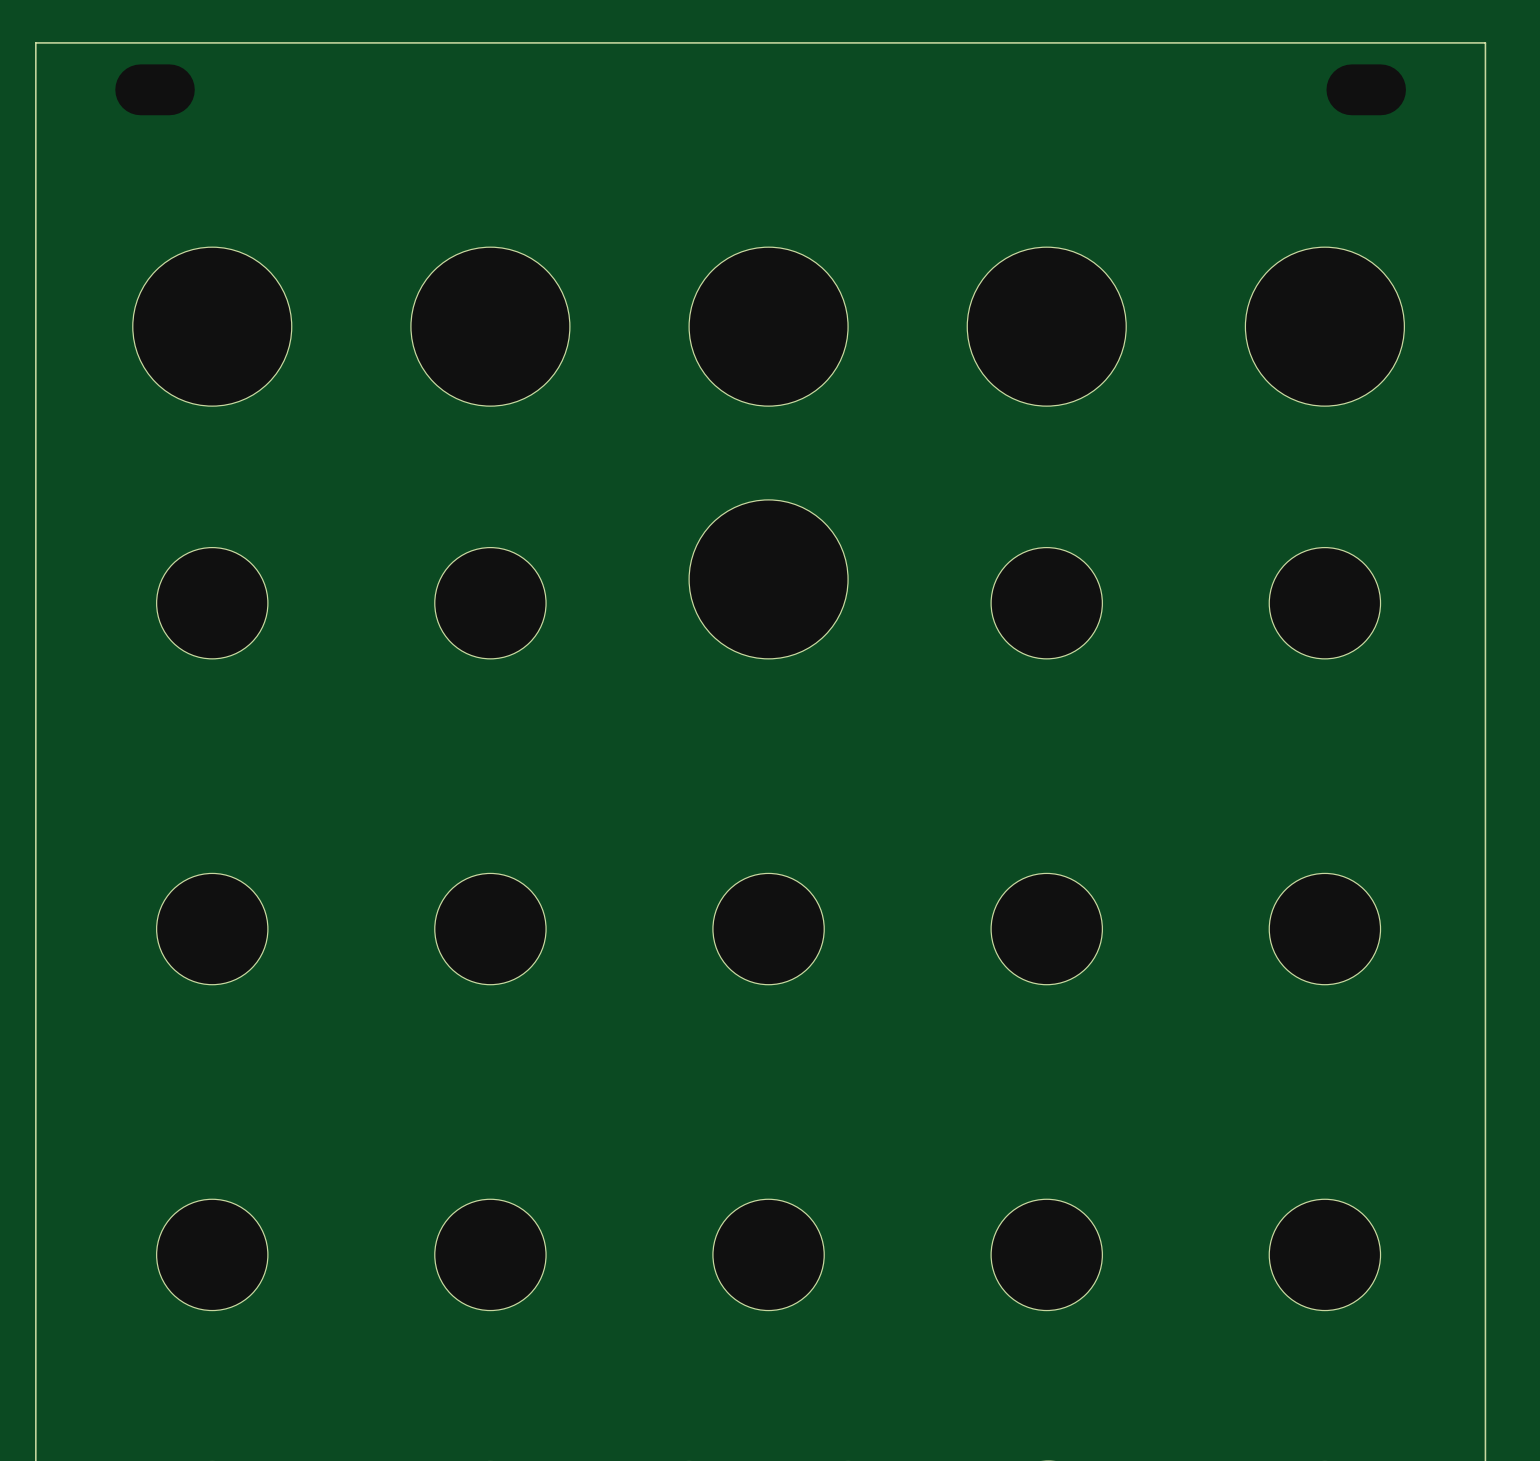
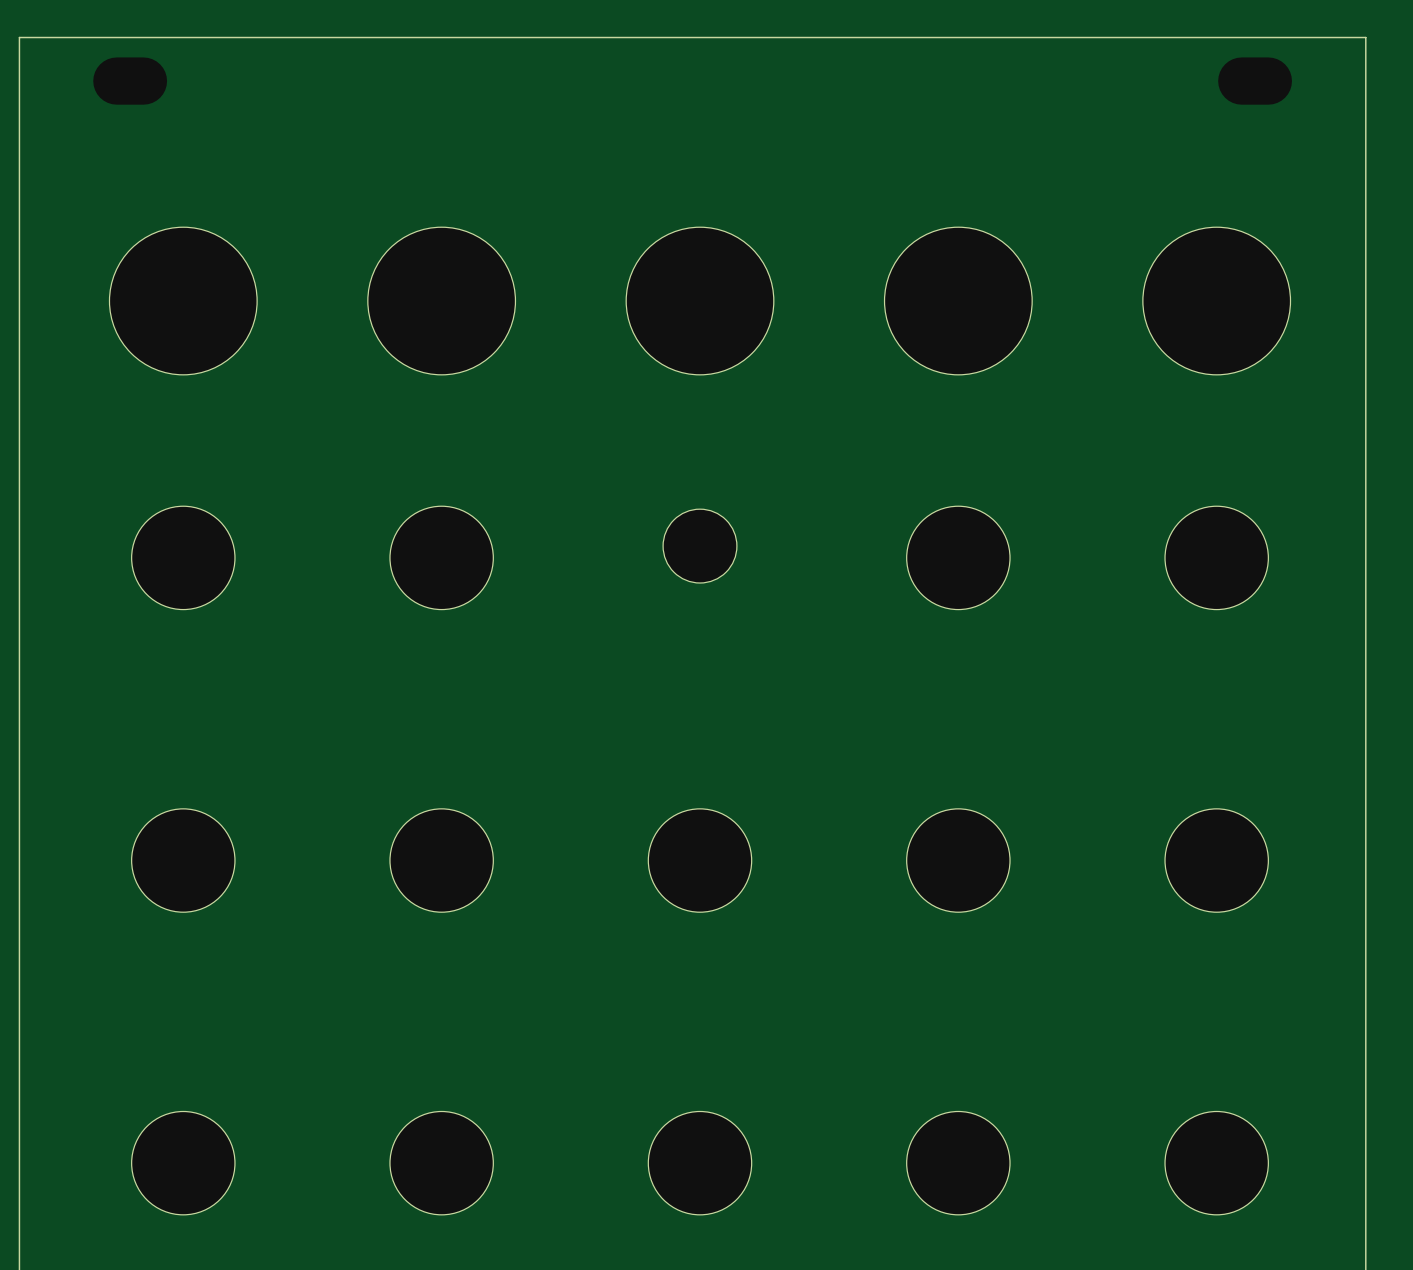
part footprint: [689, 499, 849, 659] -> [663, 509, 737, 583]

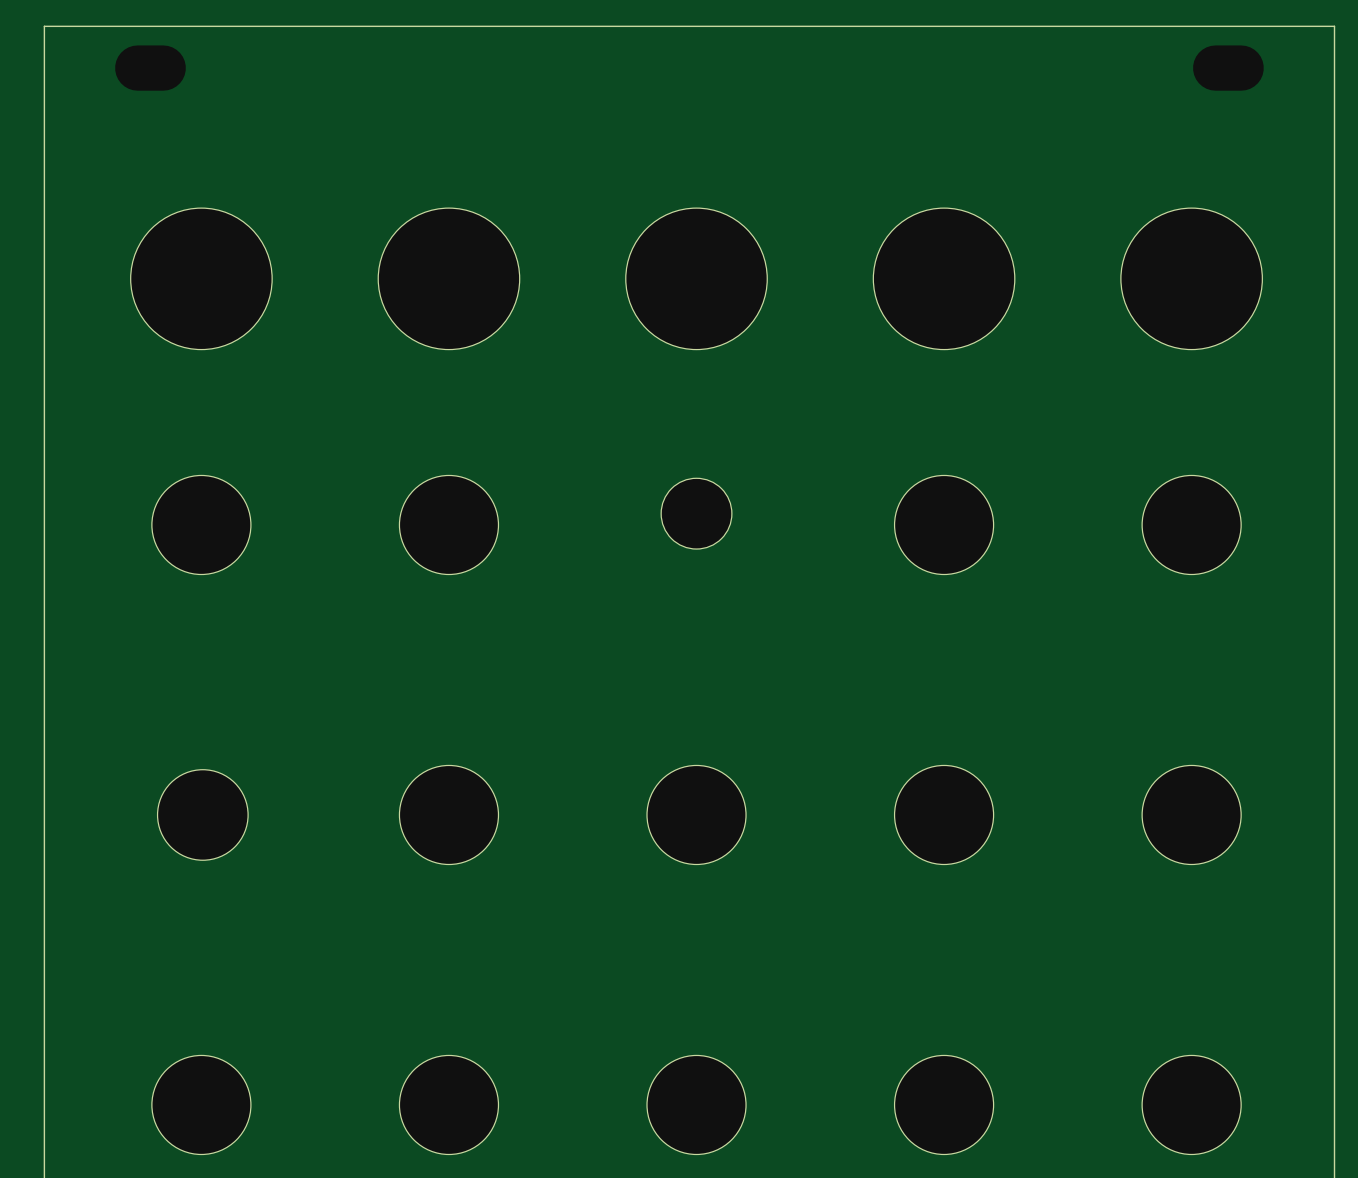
part footprint: [131, 808, 235, 913] -> [157, 769, 249, 861]

